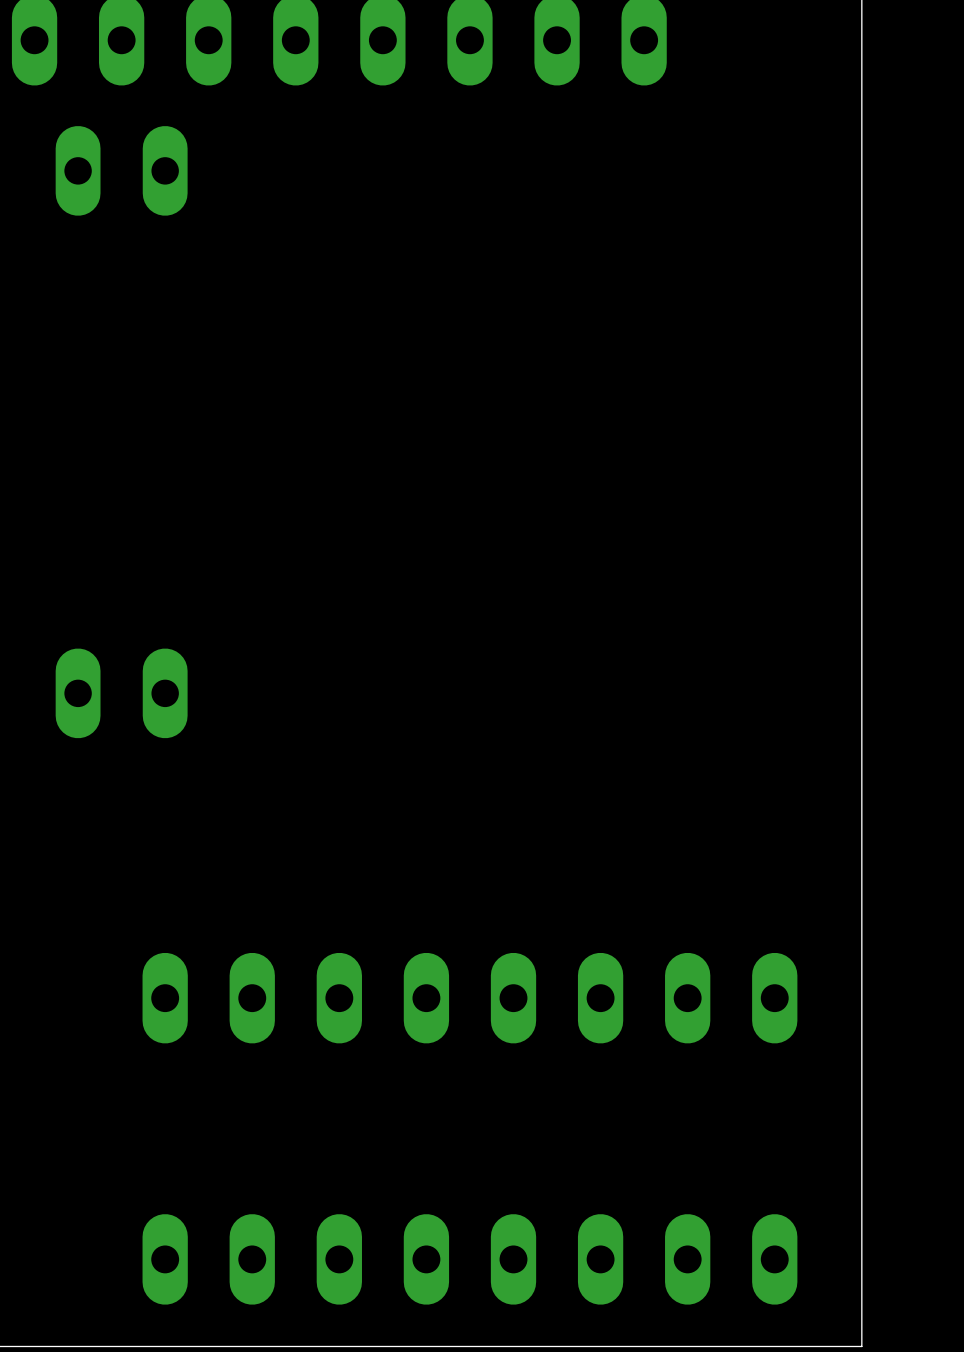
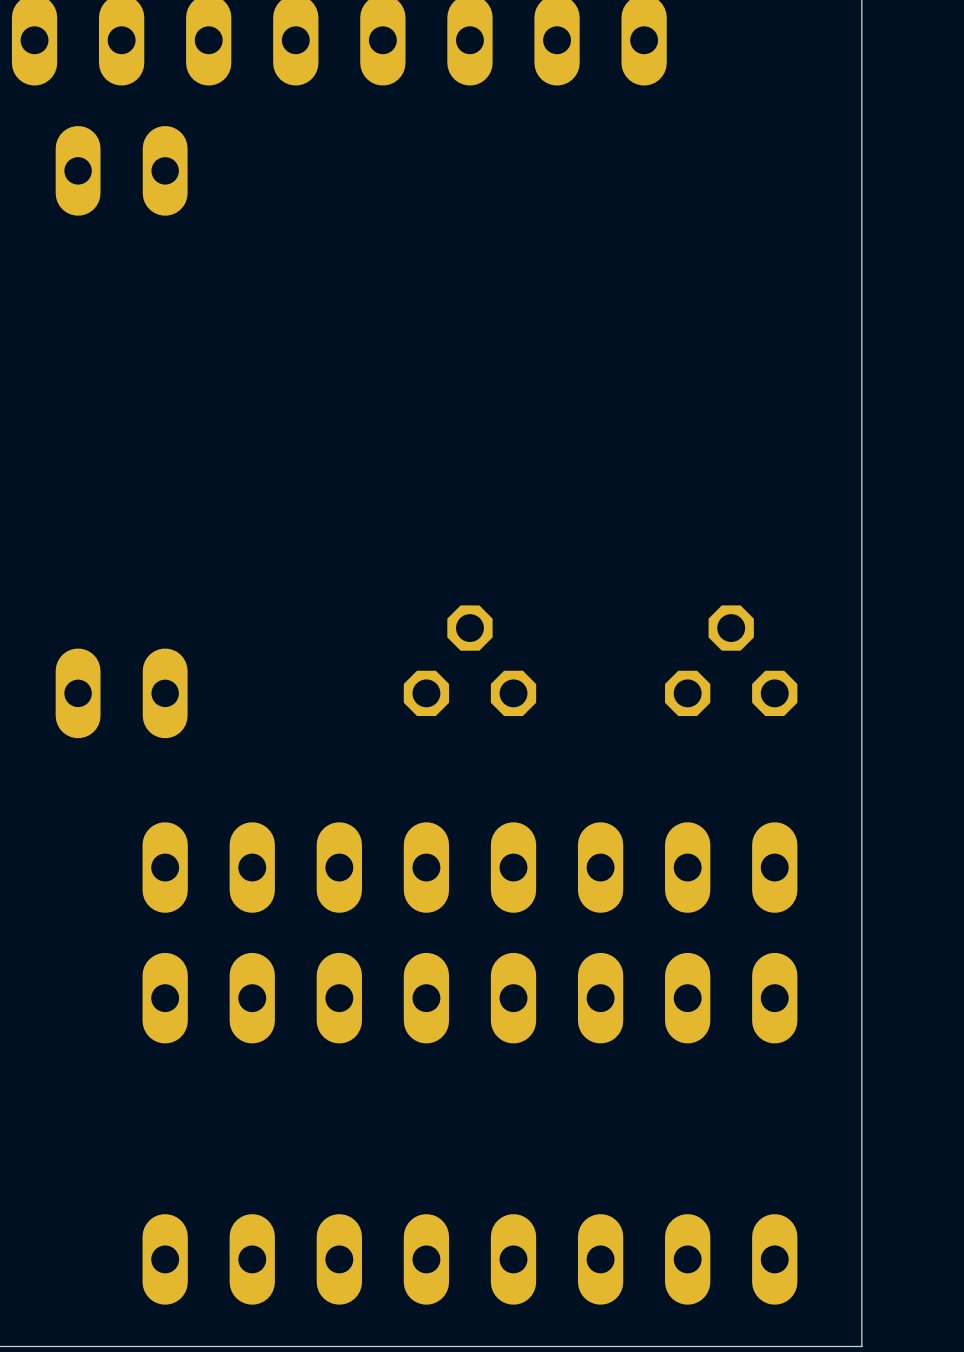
part: none -> (469, 660)
part: none -> (731, 660)
part: none -> (469, 867)

